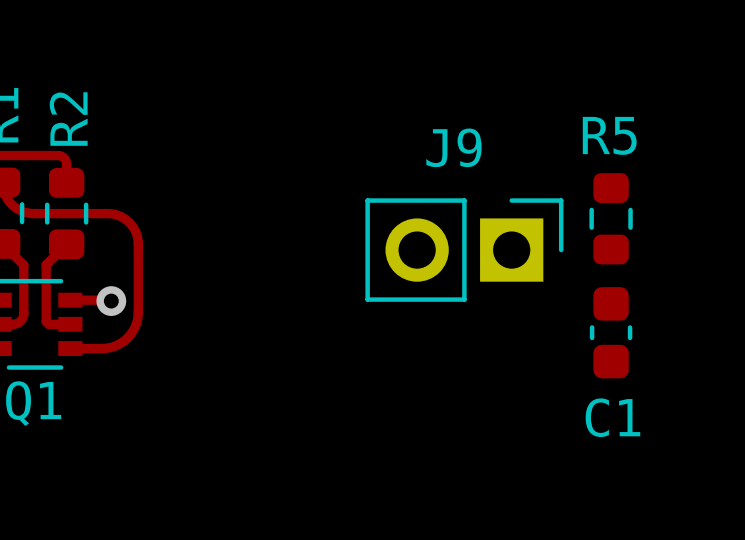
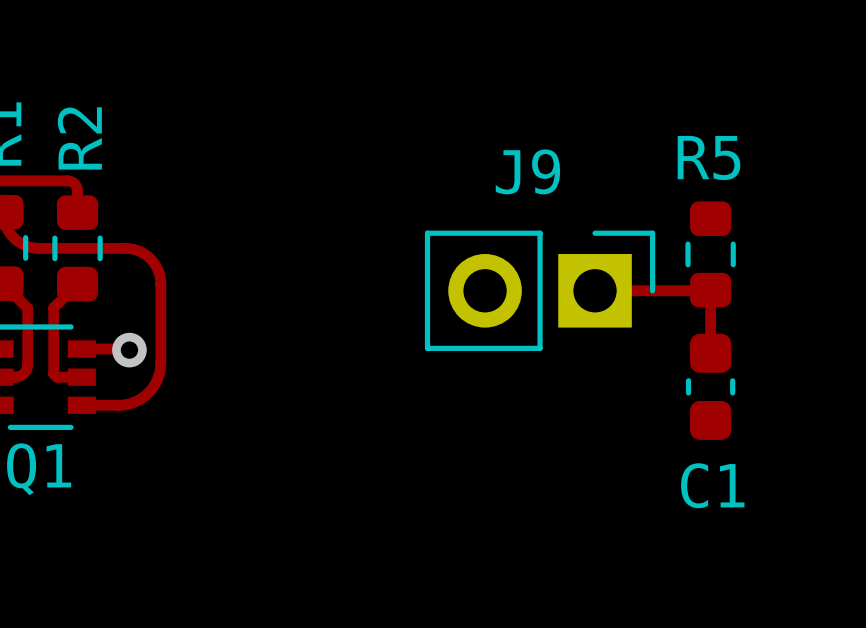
top track: none -> (595, 290) (710, 290) (710, 353)

